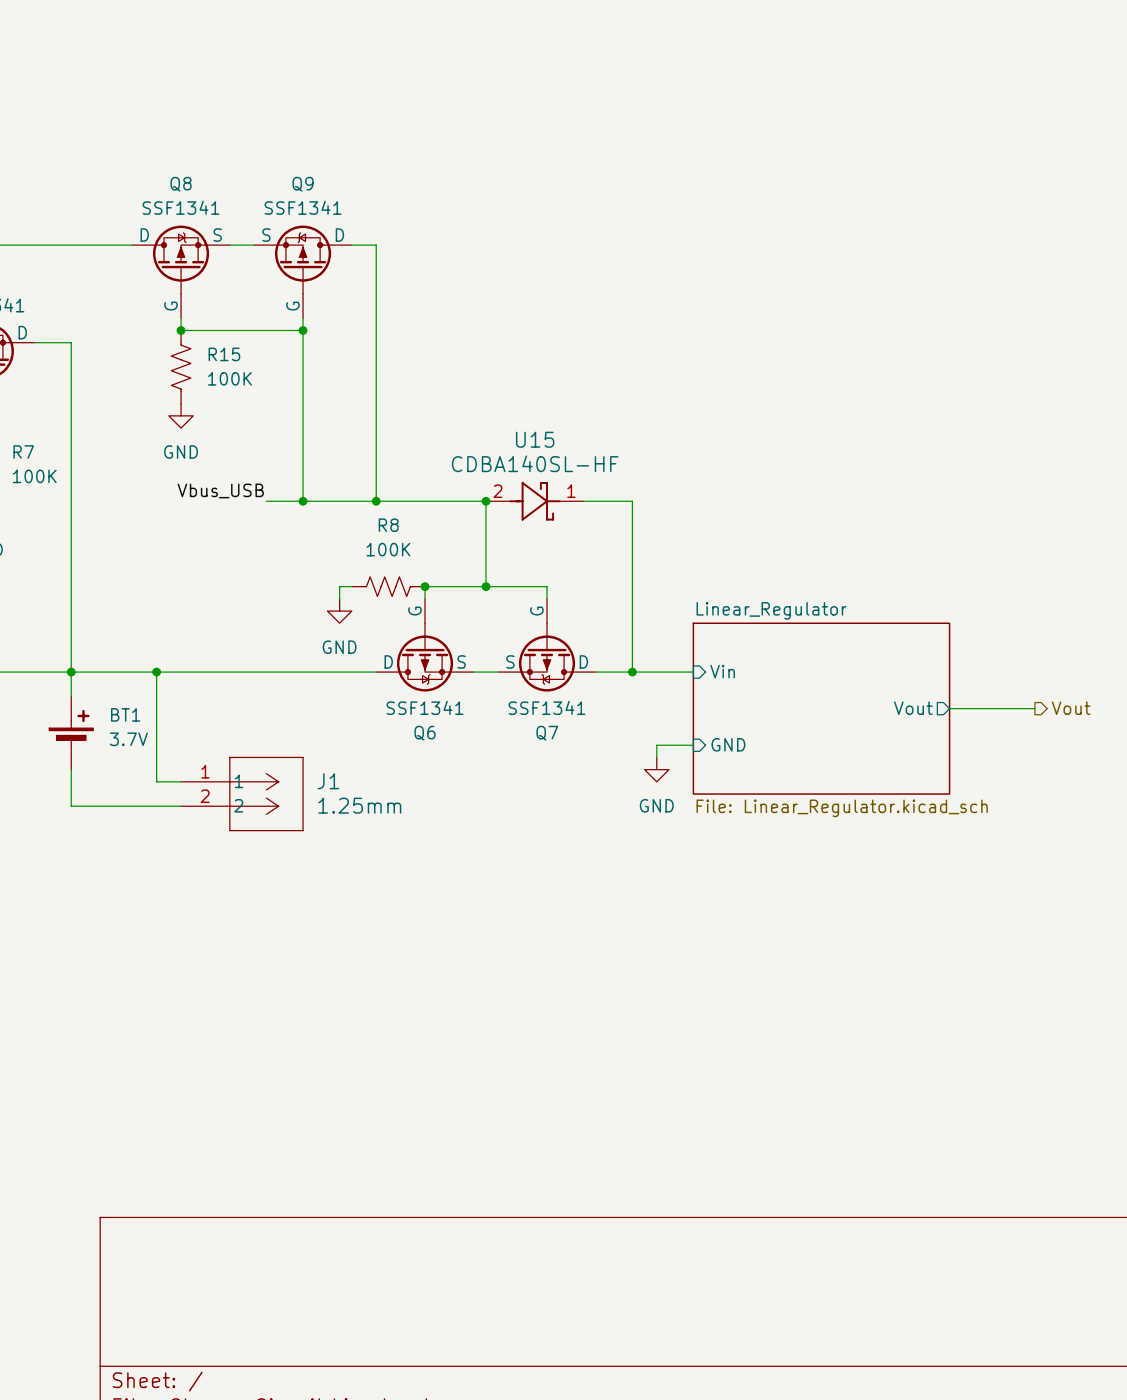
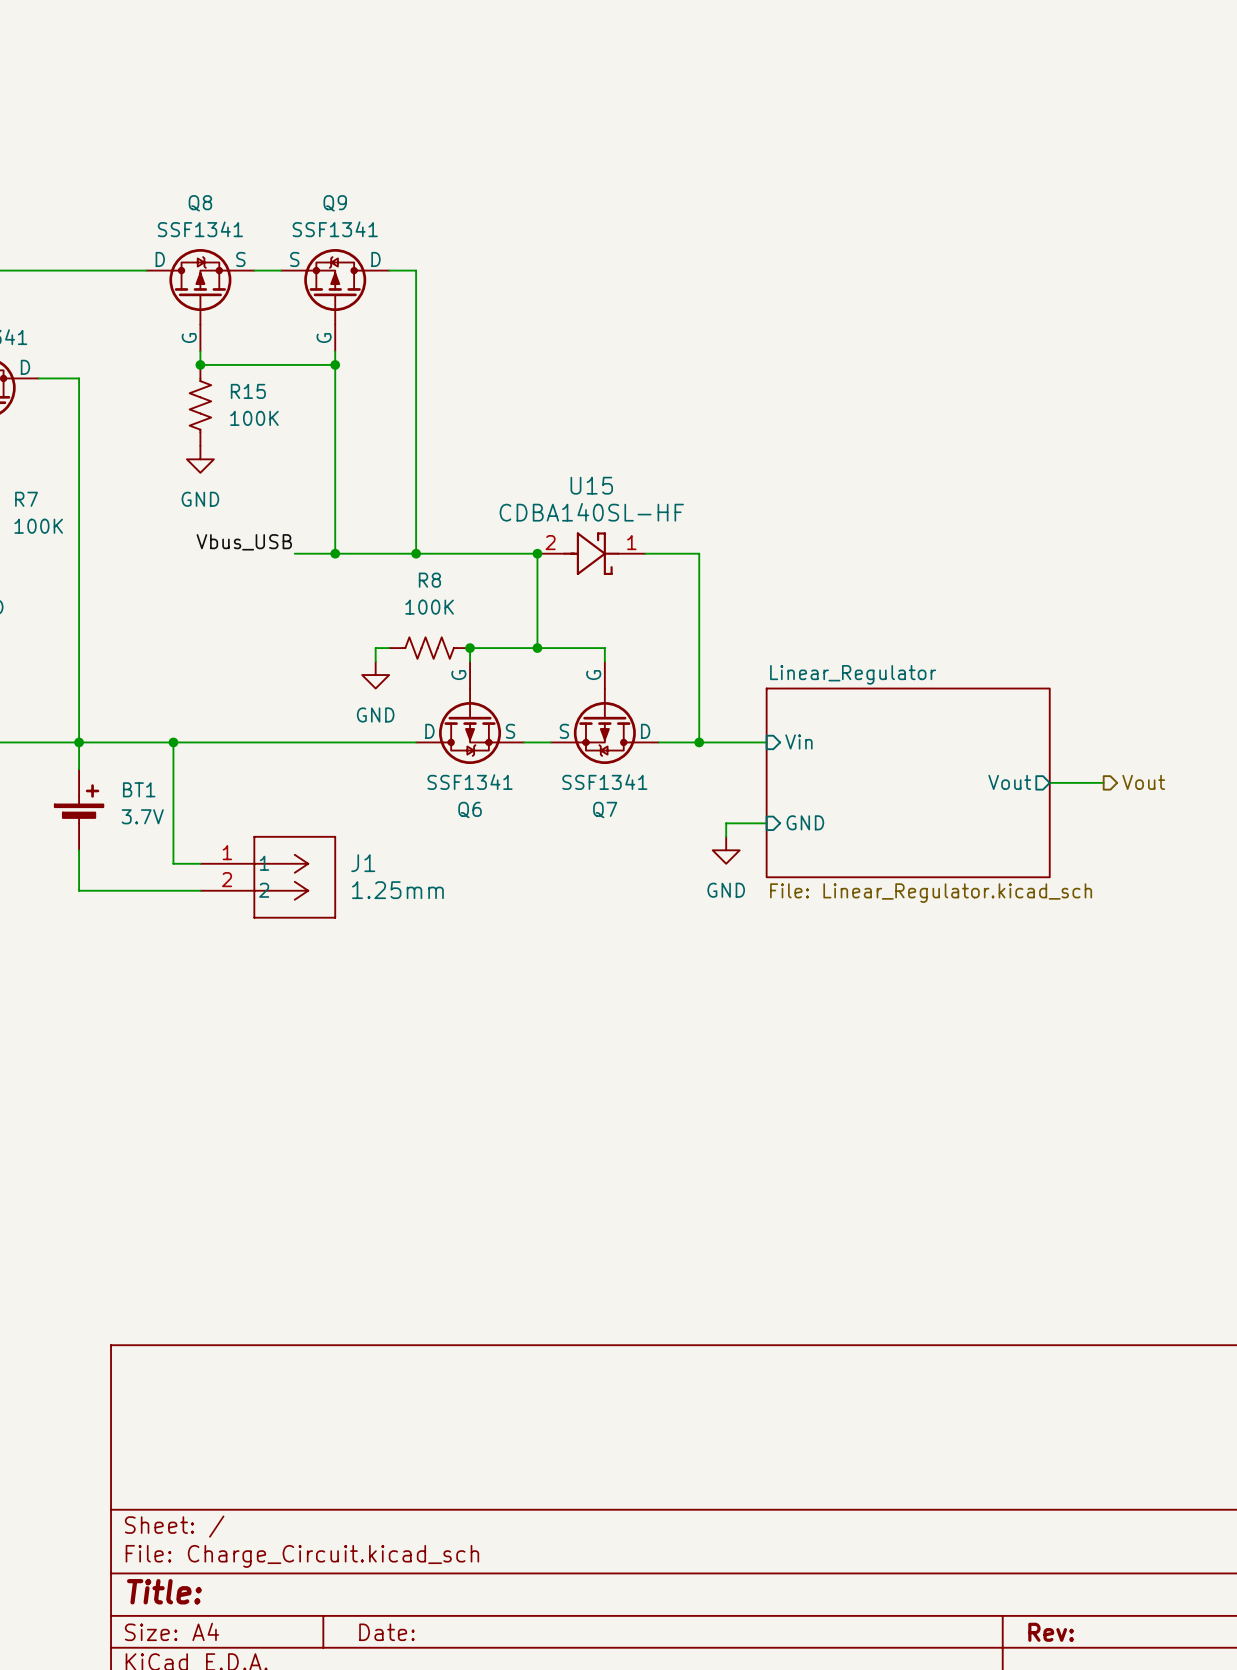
wire: (998, 708) (1034, 708) -> none
hierarchical label position: Vout (1071, 708) -> Vout (1143, 782)

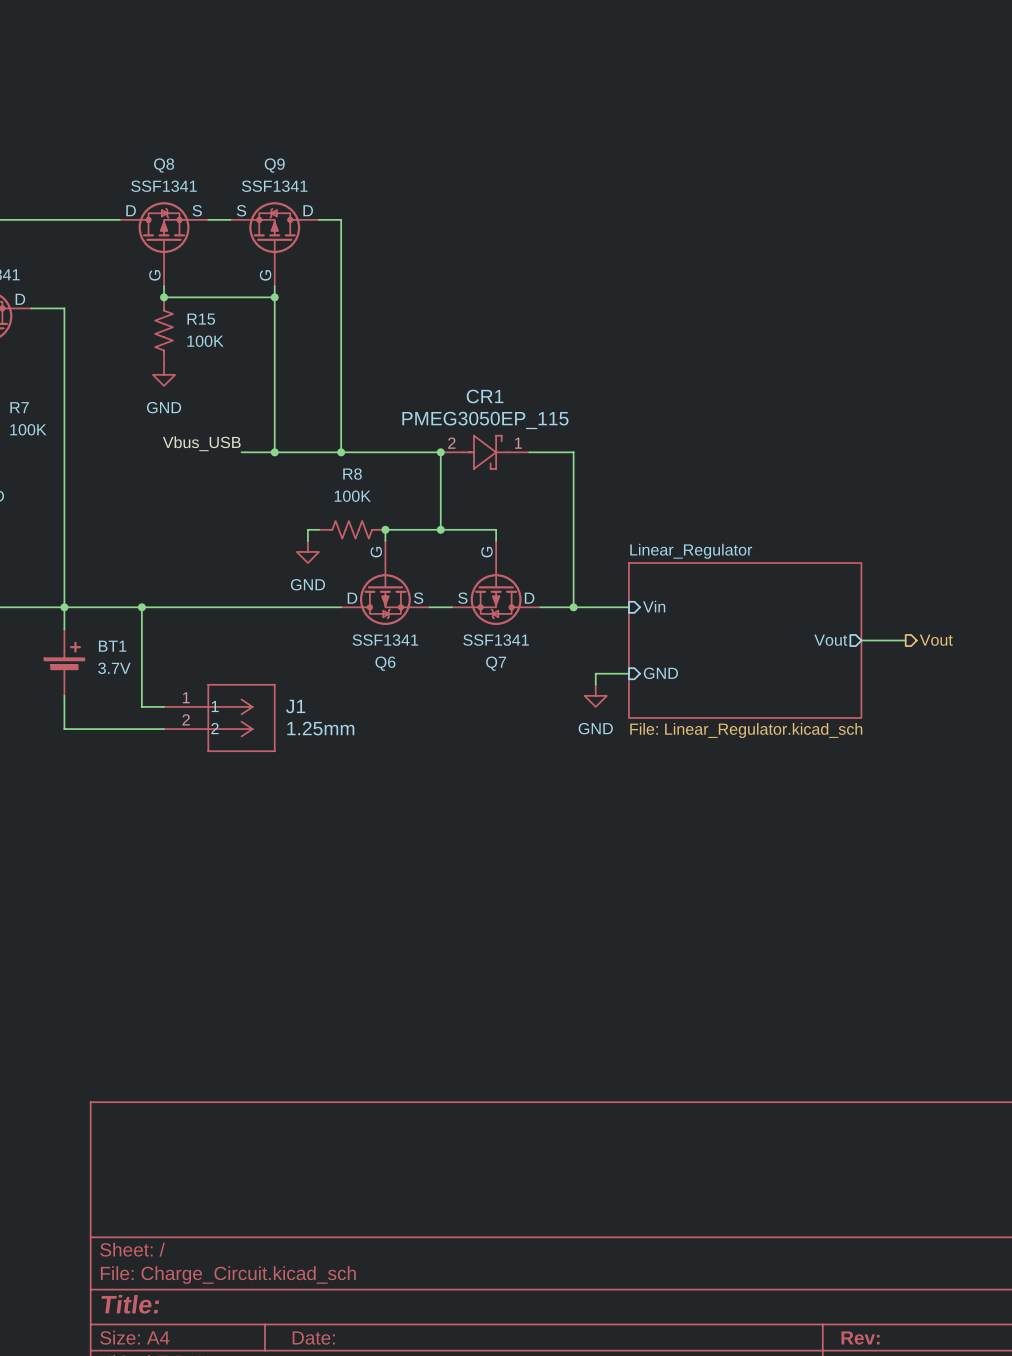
U15: CDBA140SL-HF (591, 553) -> none
CR1: none -> PMEG3050EP_115 (485, 452)

